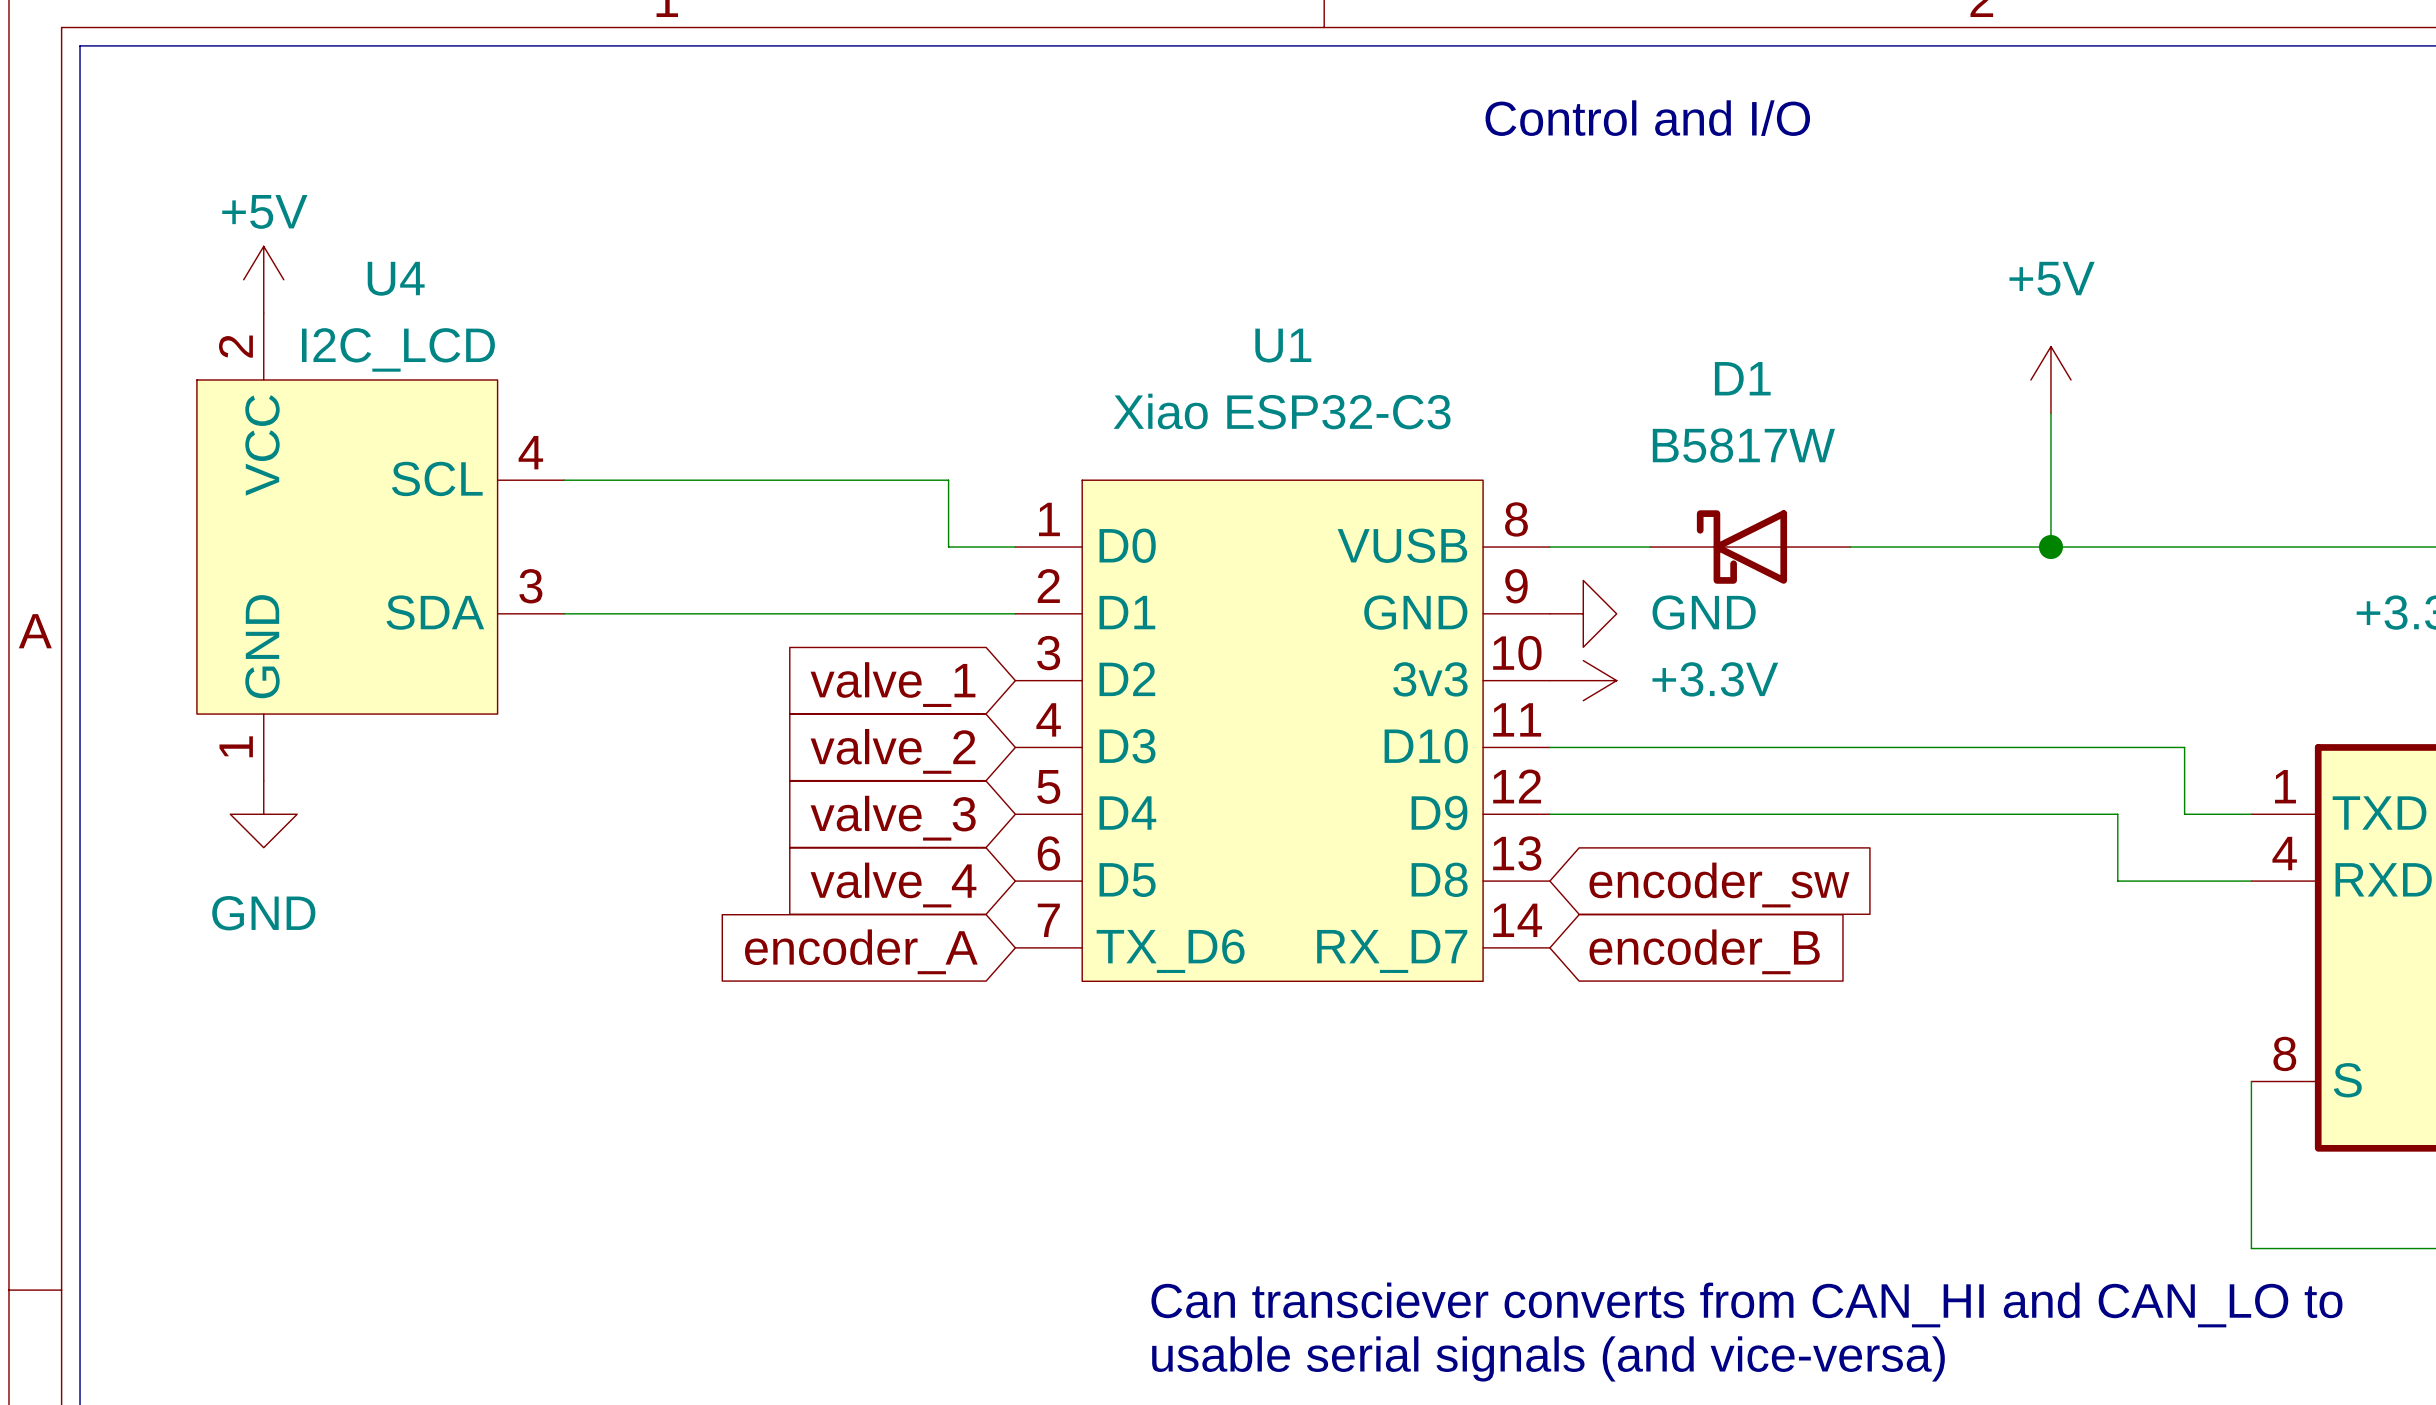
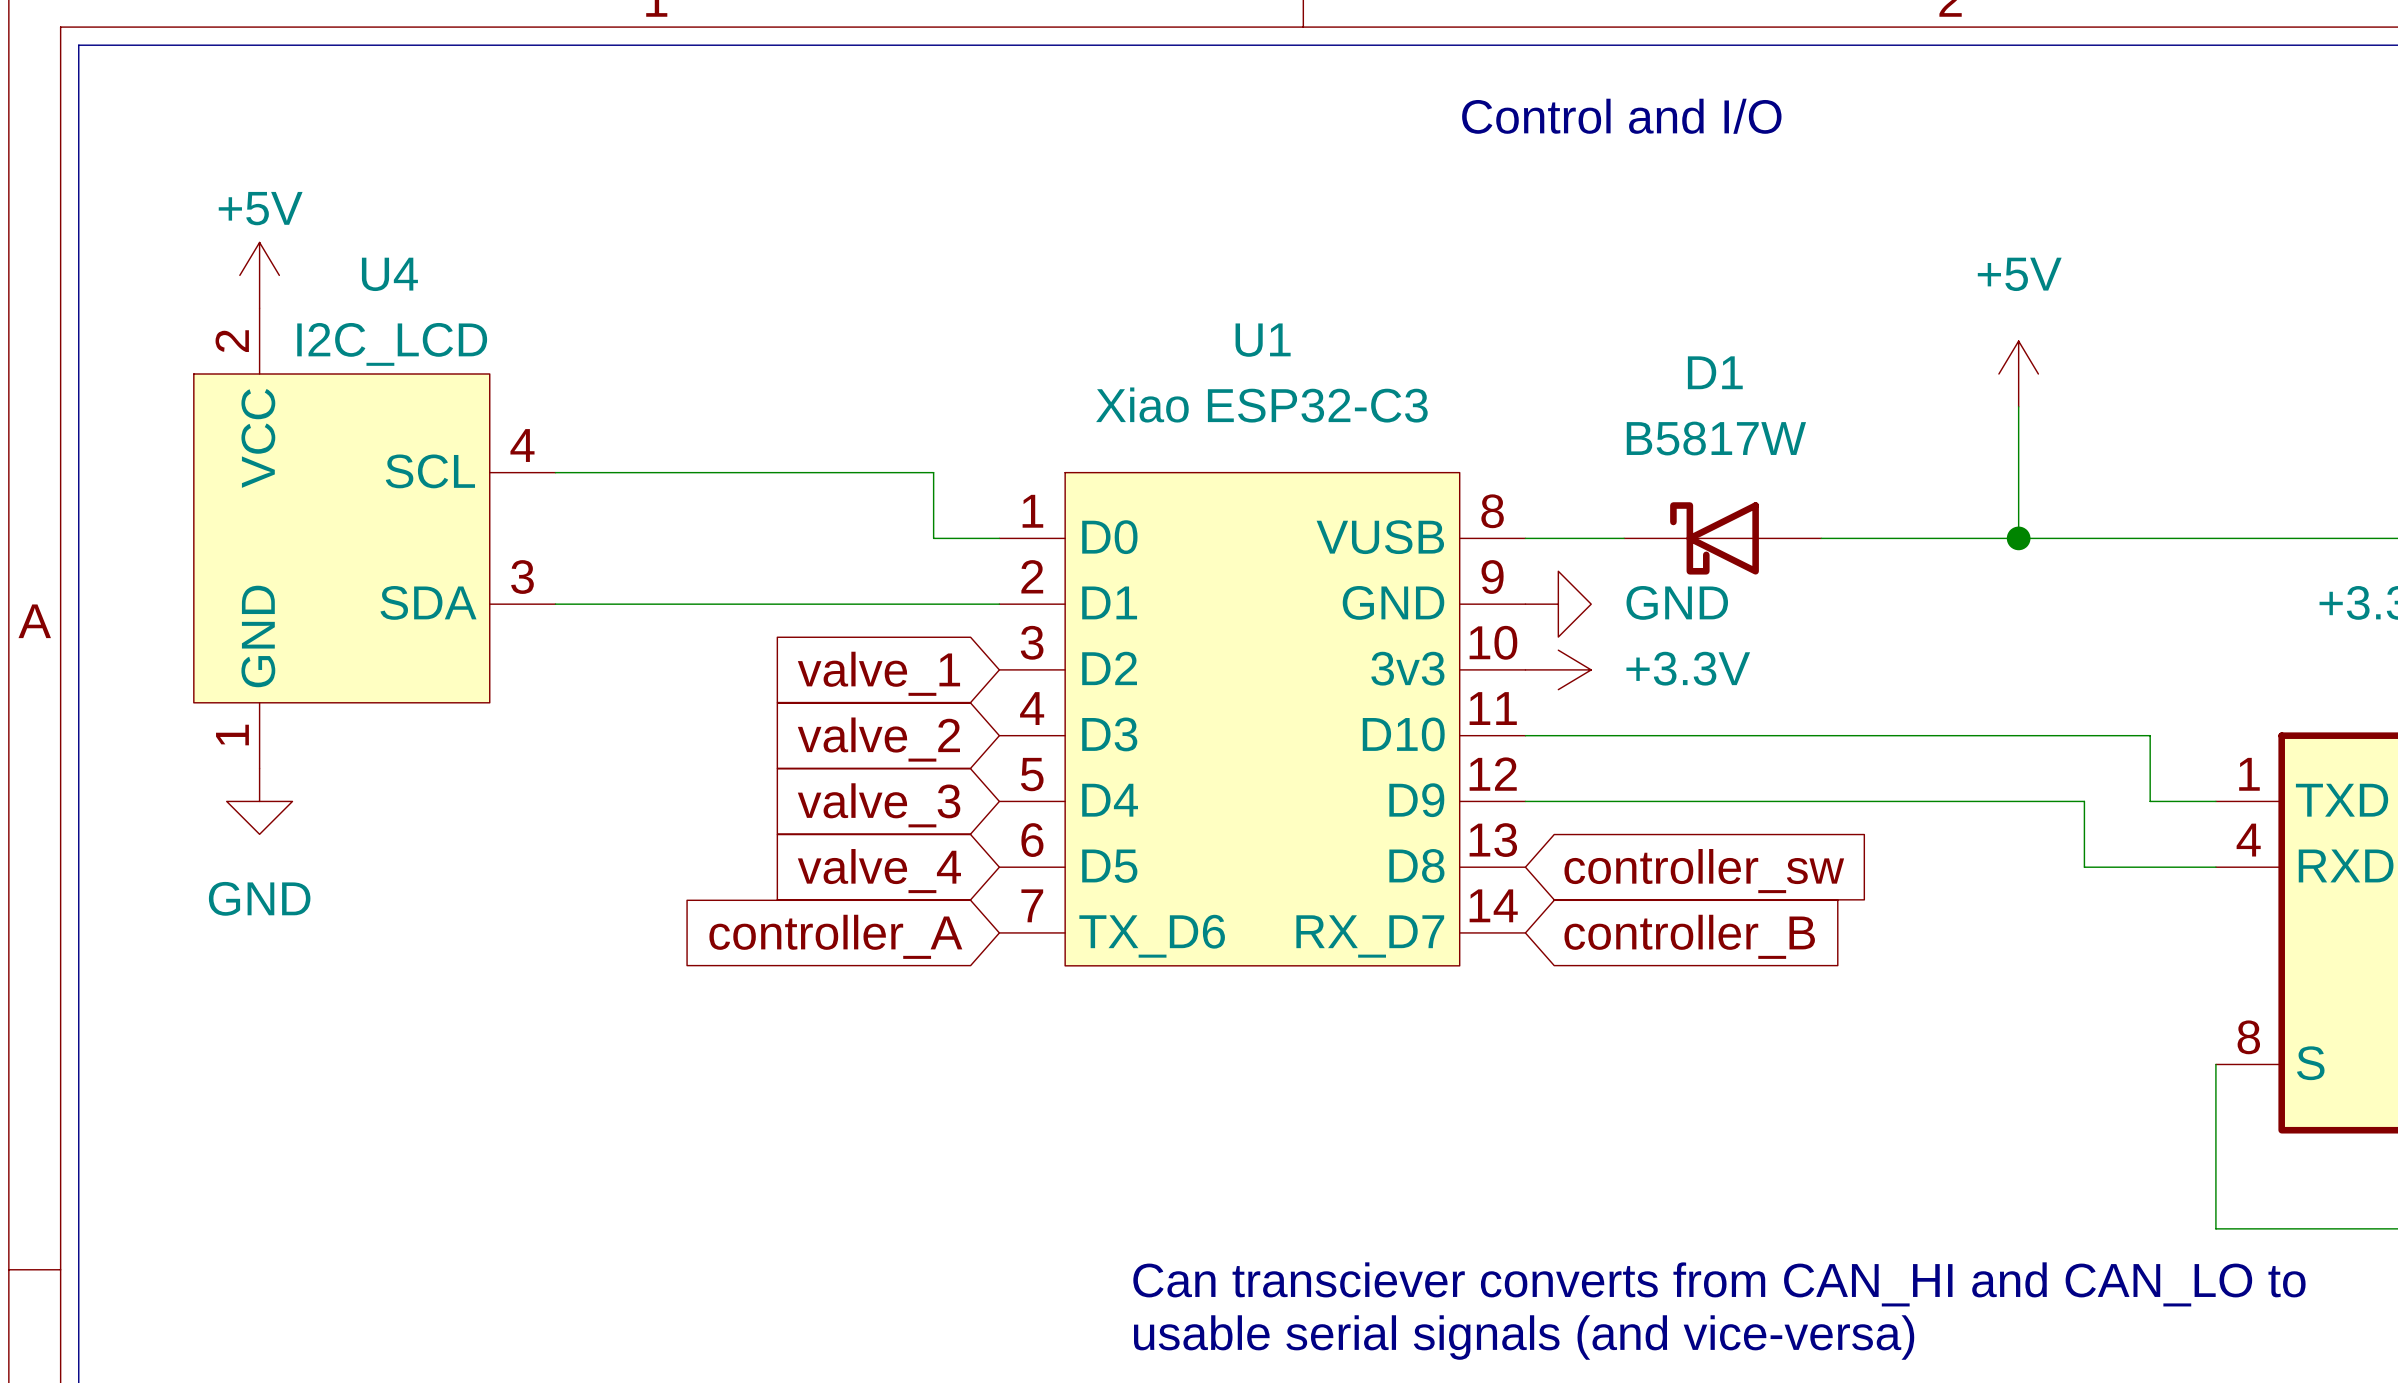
global label: encoder_sw (1719, 885) -> controller_sw (1704, 871)
global label: encoder_A (861, 951) -> controller_A (835, 936)
global label: encoder_B (1704, 951) -> controller_B (1689, 936)

